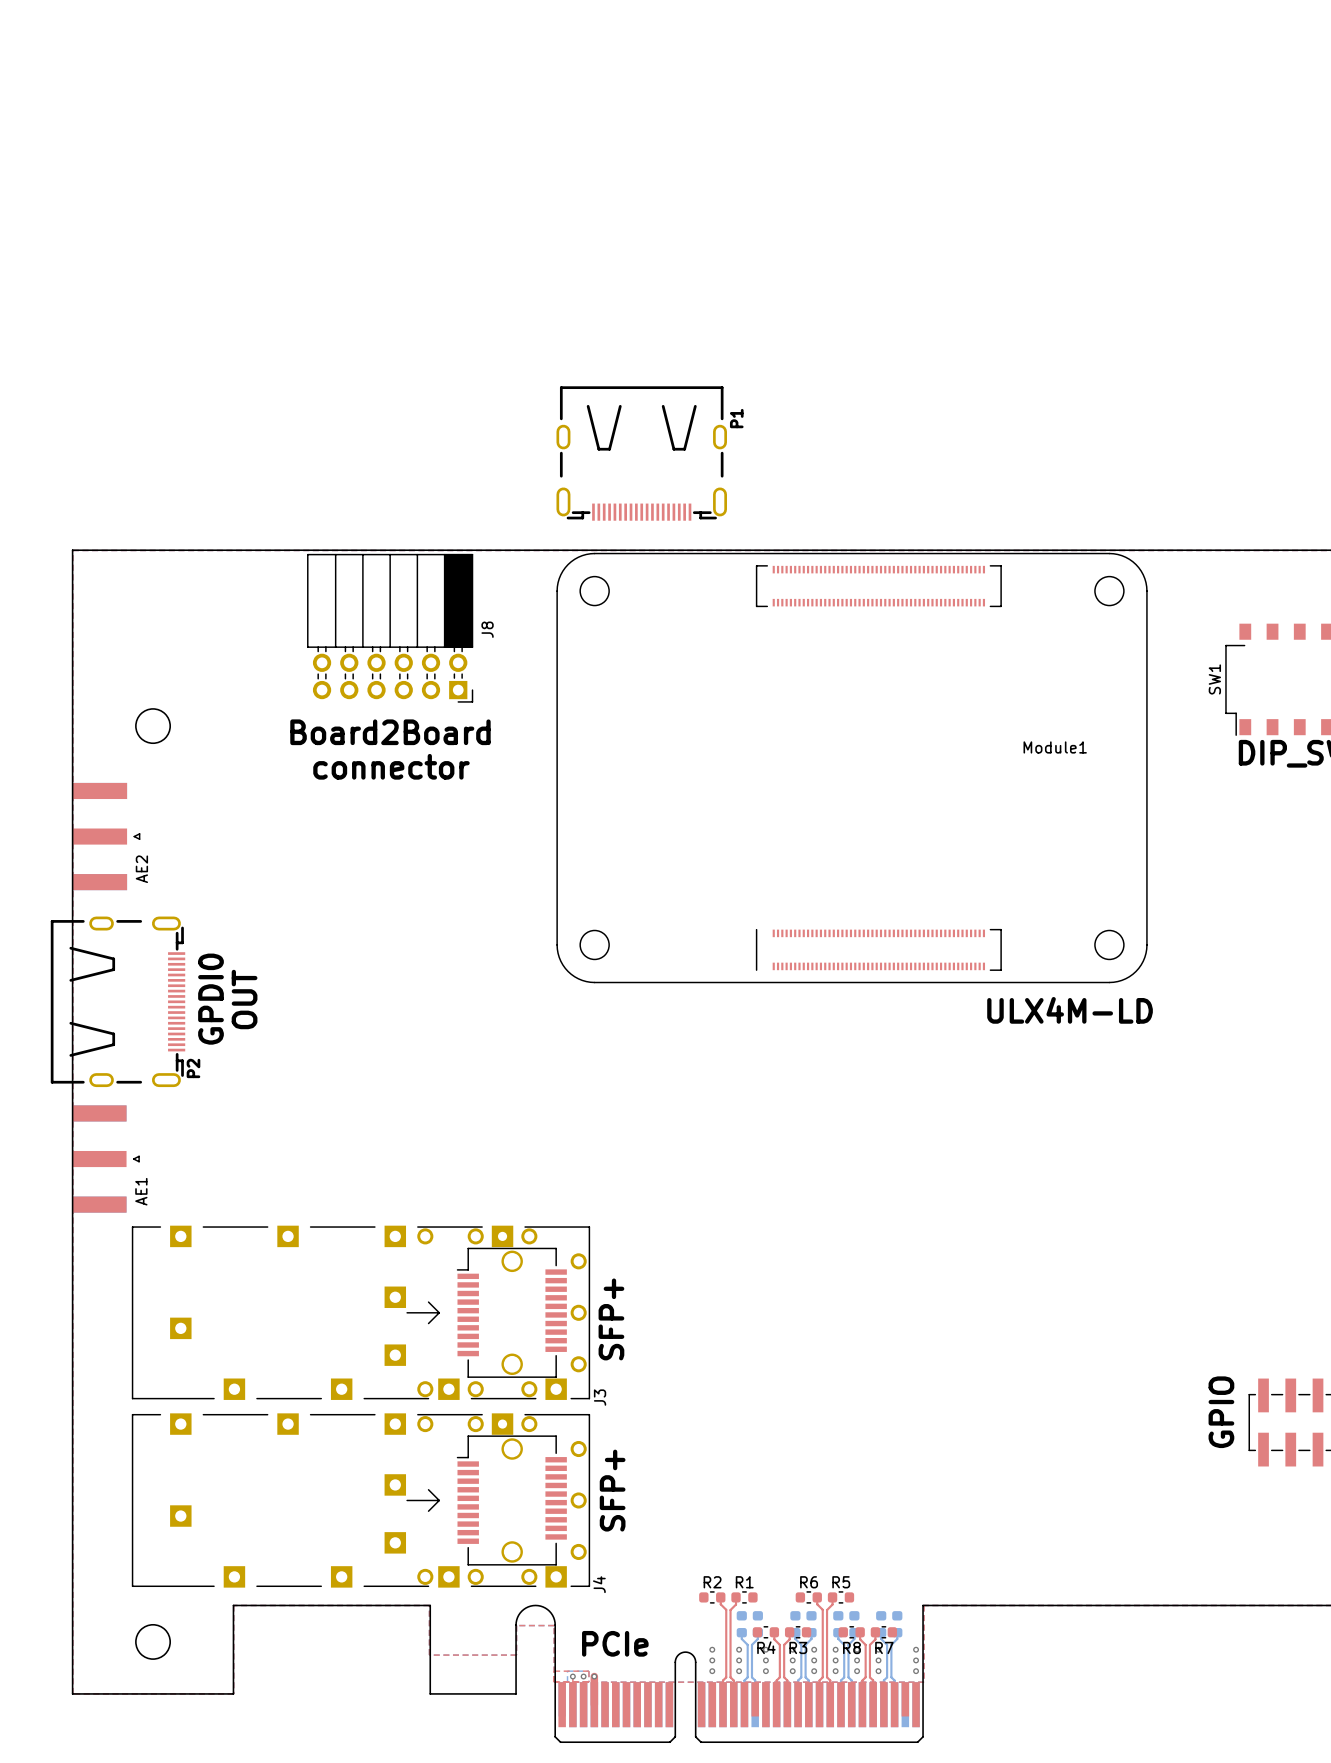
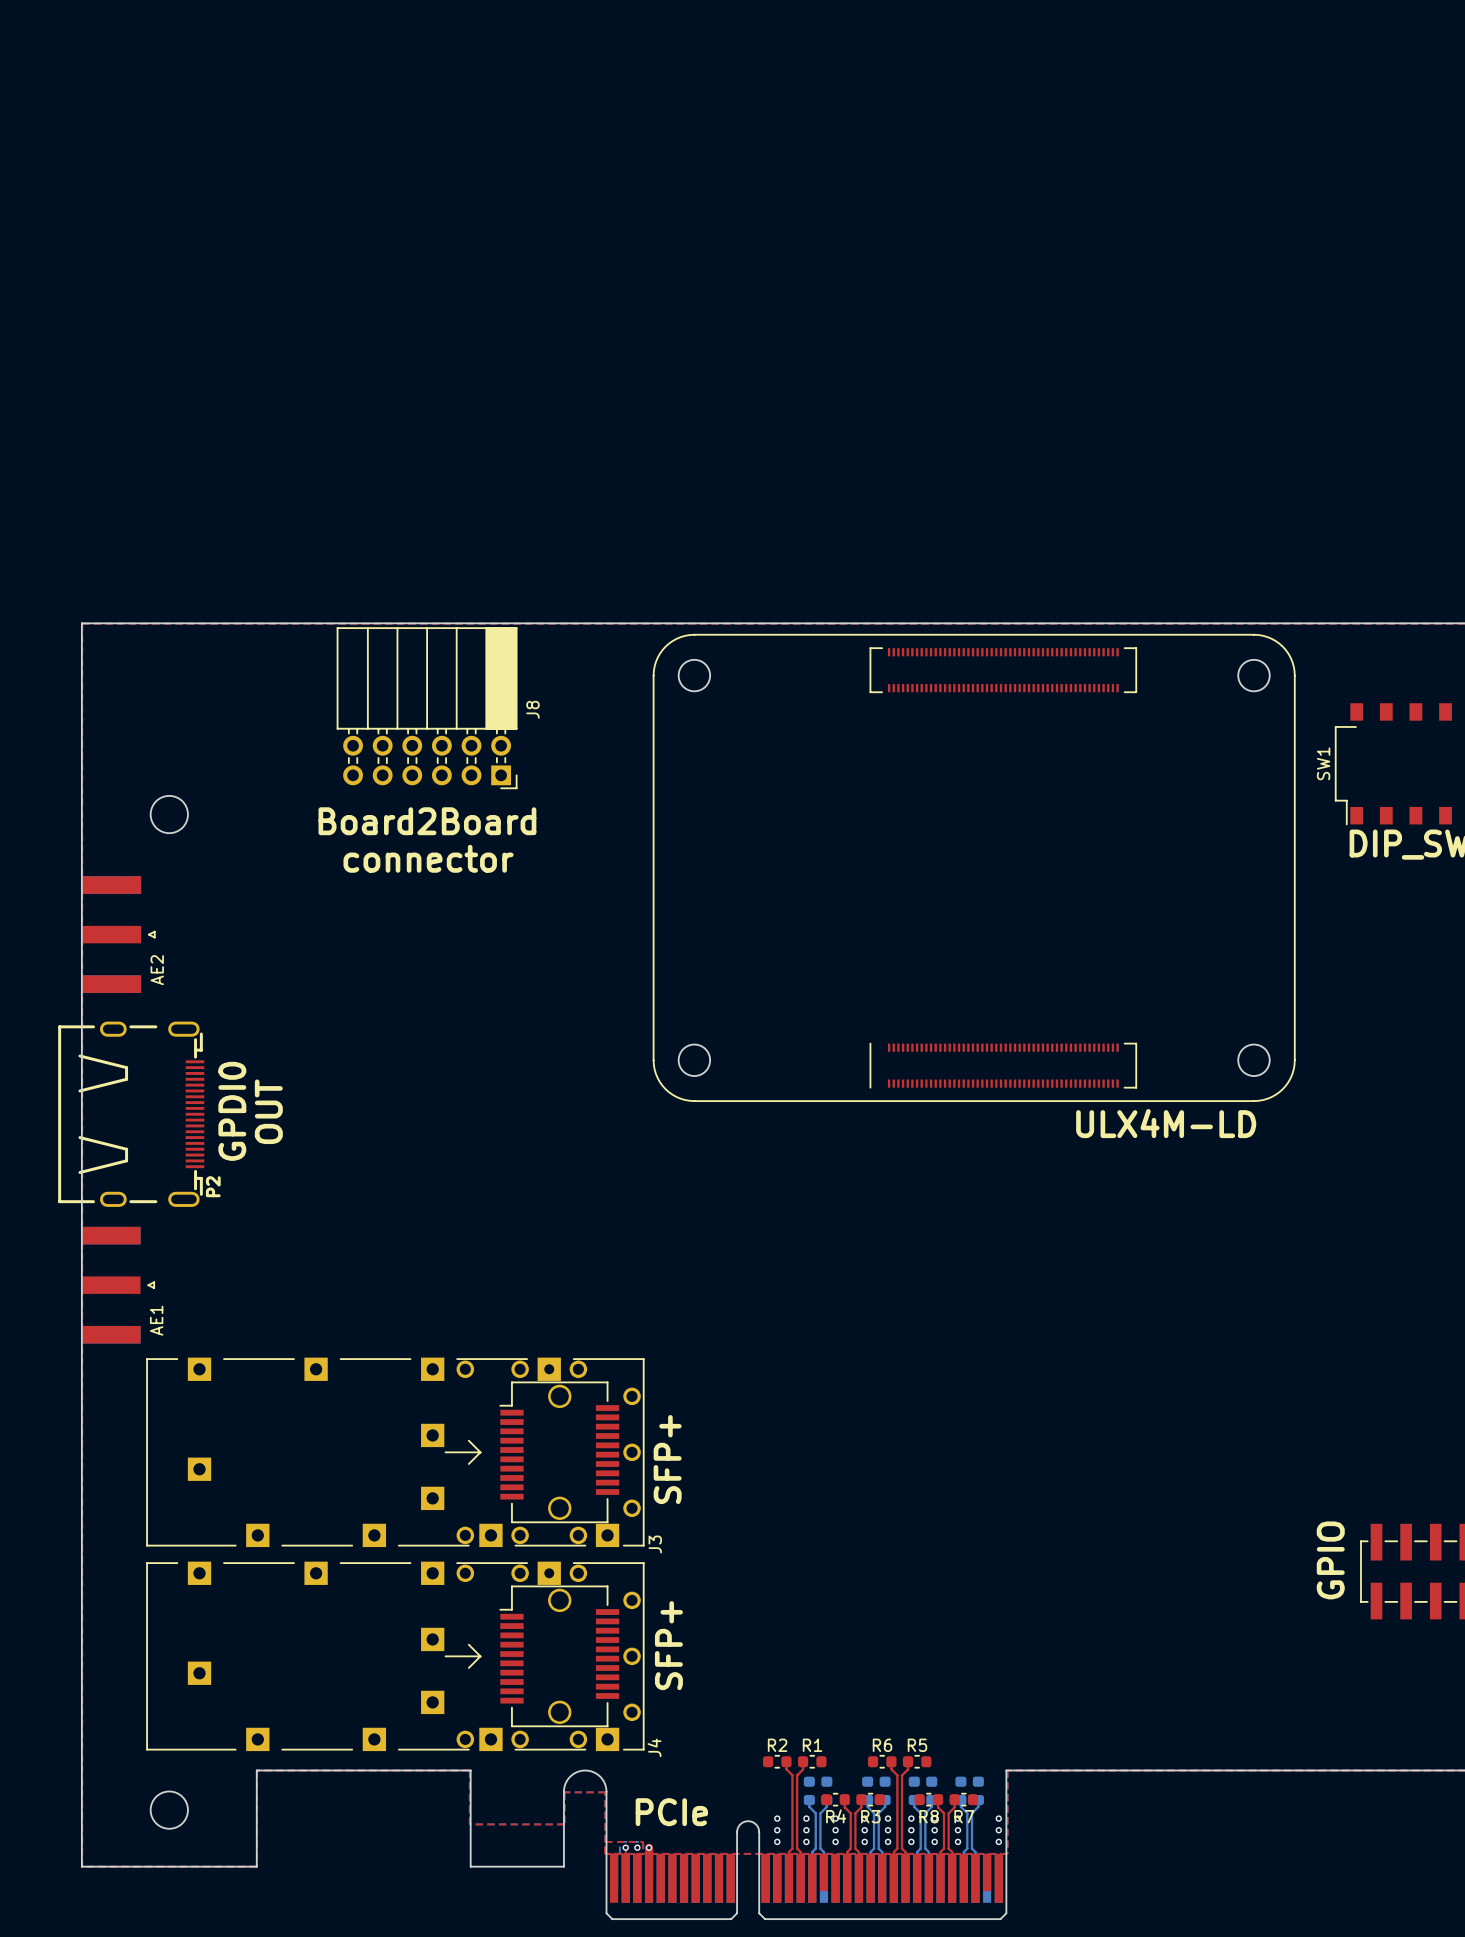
P1: (641, 453) -> none
Module1: (852, 768) -> none
part: none -> (974, 867)

